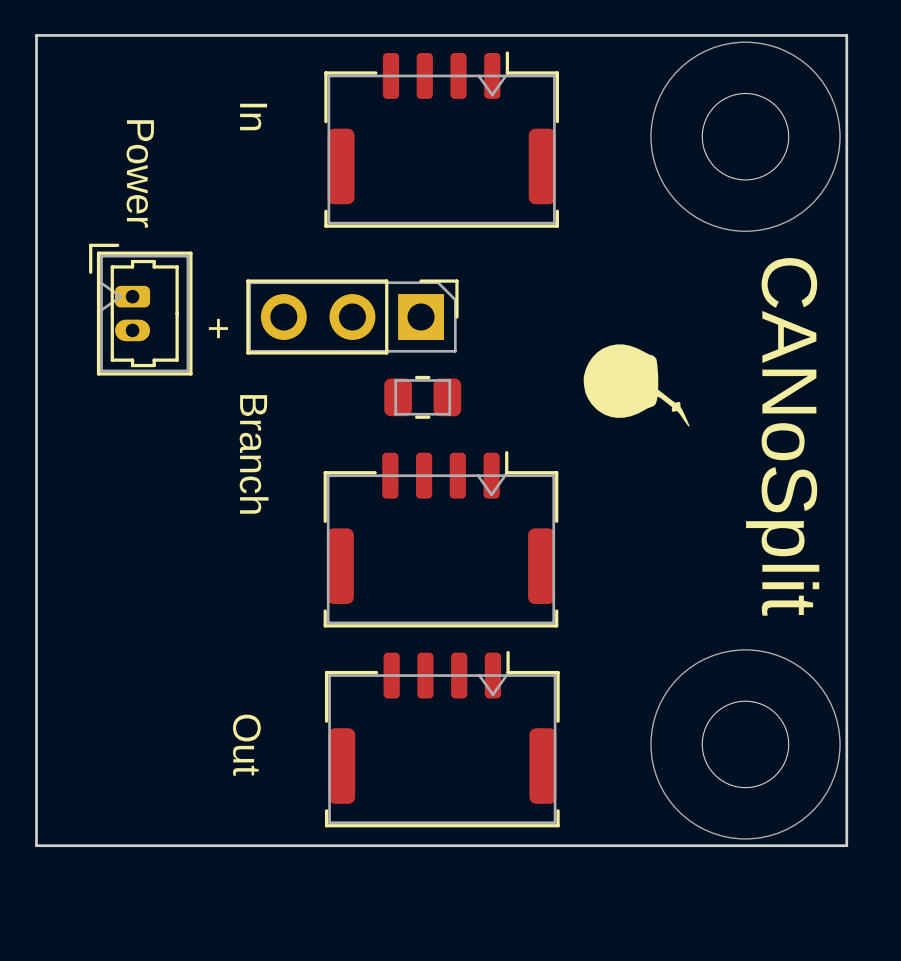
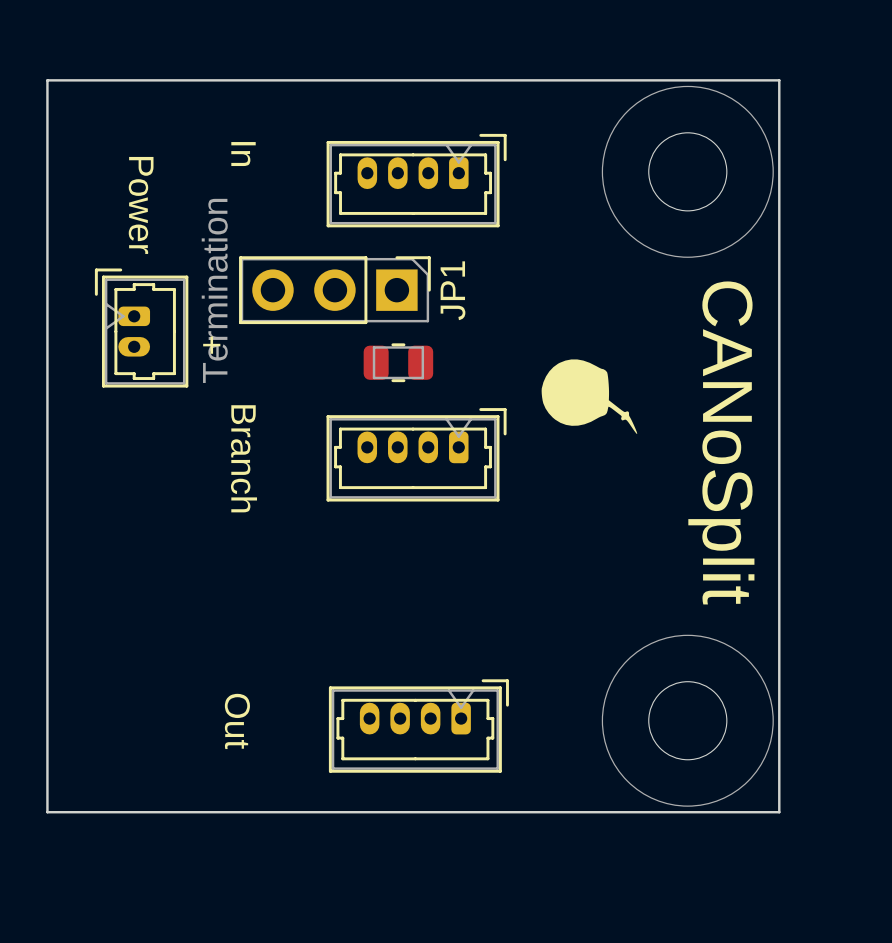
part footprint: [324, 51, 559, 228] -> [326, 133, 507, 228]
JP1: none -> Termination (334, 290)
part: (352, 317) -> none
part position: (422, 397) -> (398, 362)
part: none -> (416, 454)
part: (440, 539) -> none
part footprint: [324, 650, 560, 828] -> [328, 679, 509, 773]

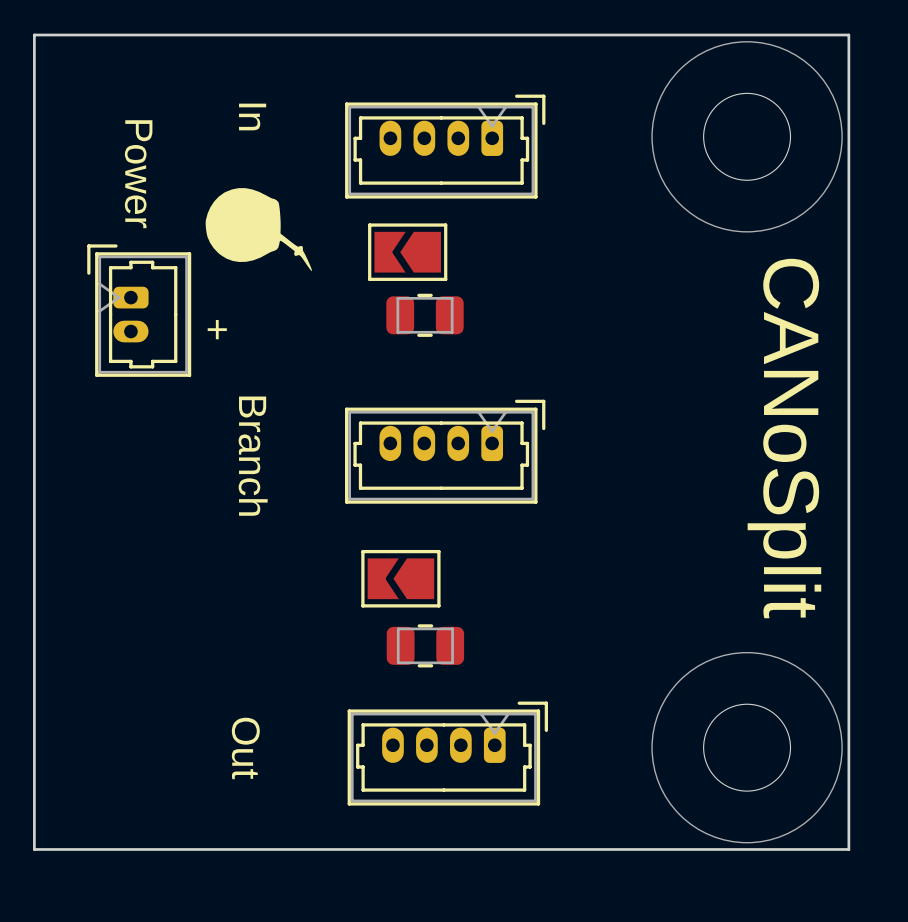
part: none -> (407, 252)
JP1: Termination (334, 290) -> none
part position: (398, 362) -> (425, 315)
drawing position: (589, 396) -> (258, 229)
part: none -> (400, 578)
part: none -> (425, 645)

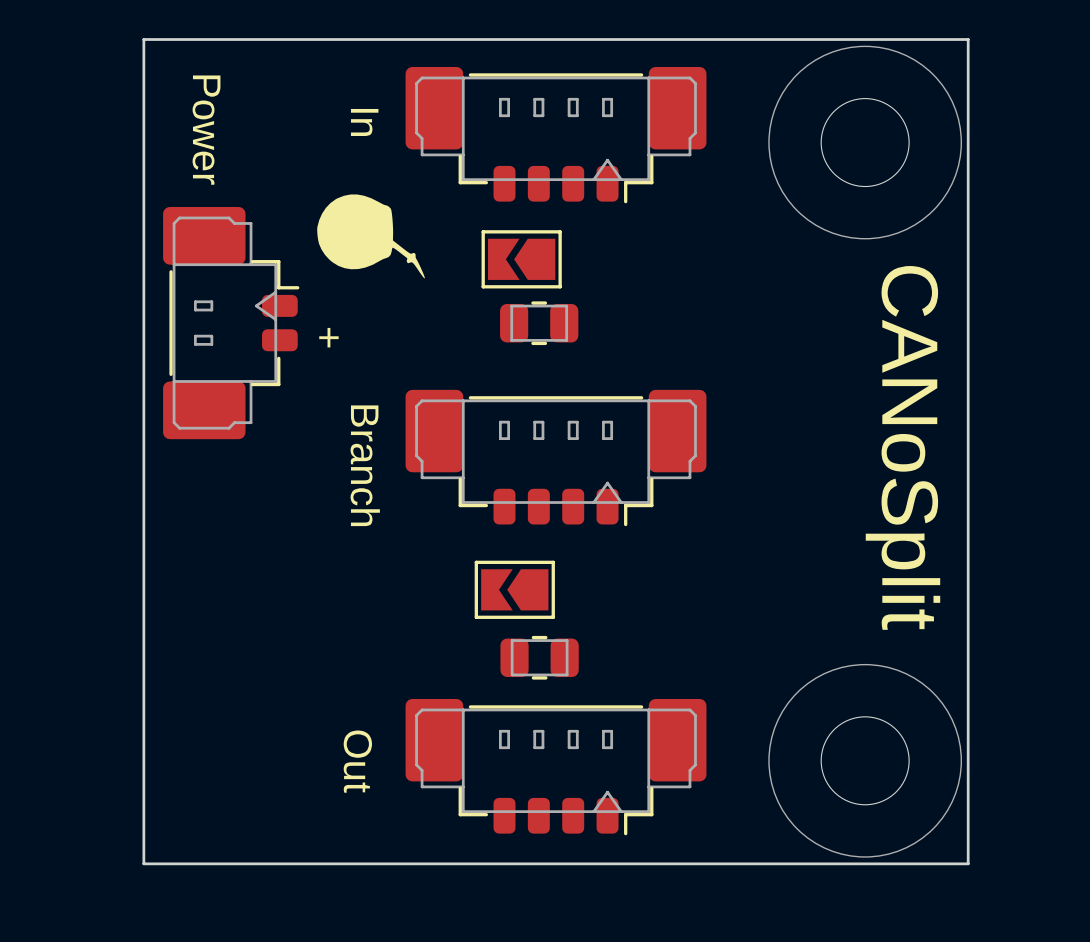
part footprint: [345, 94, 546, 199] -> [405, 66, 707, 204]
text position: Power (138, 174) -> Power (206, 130)
part footprint: [87, 244, 192, 377] -> [163, 206, 300, 440]
part footprint: [345, 399, 546, 504] -> [405, 389, 707, 527]
part footprint: [347, 701, 549, 806] -> [405, 698, 707, 836]

